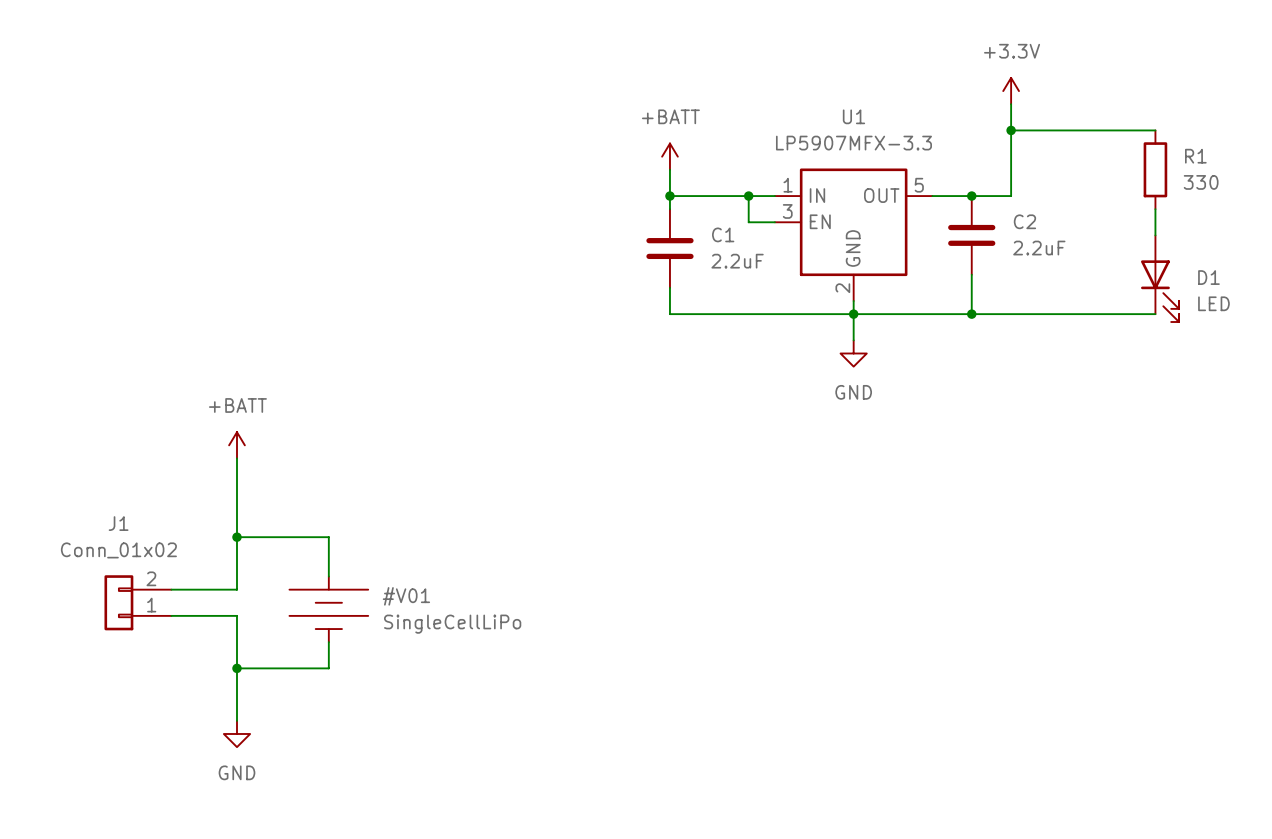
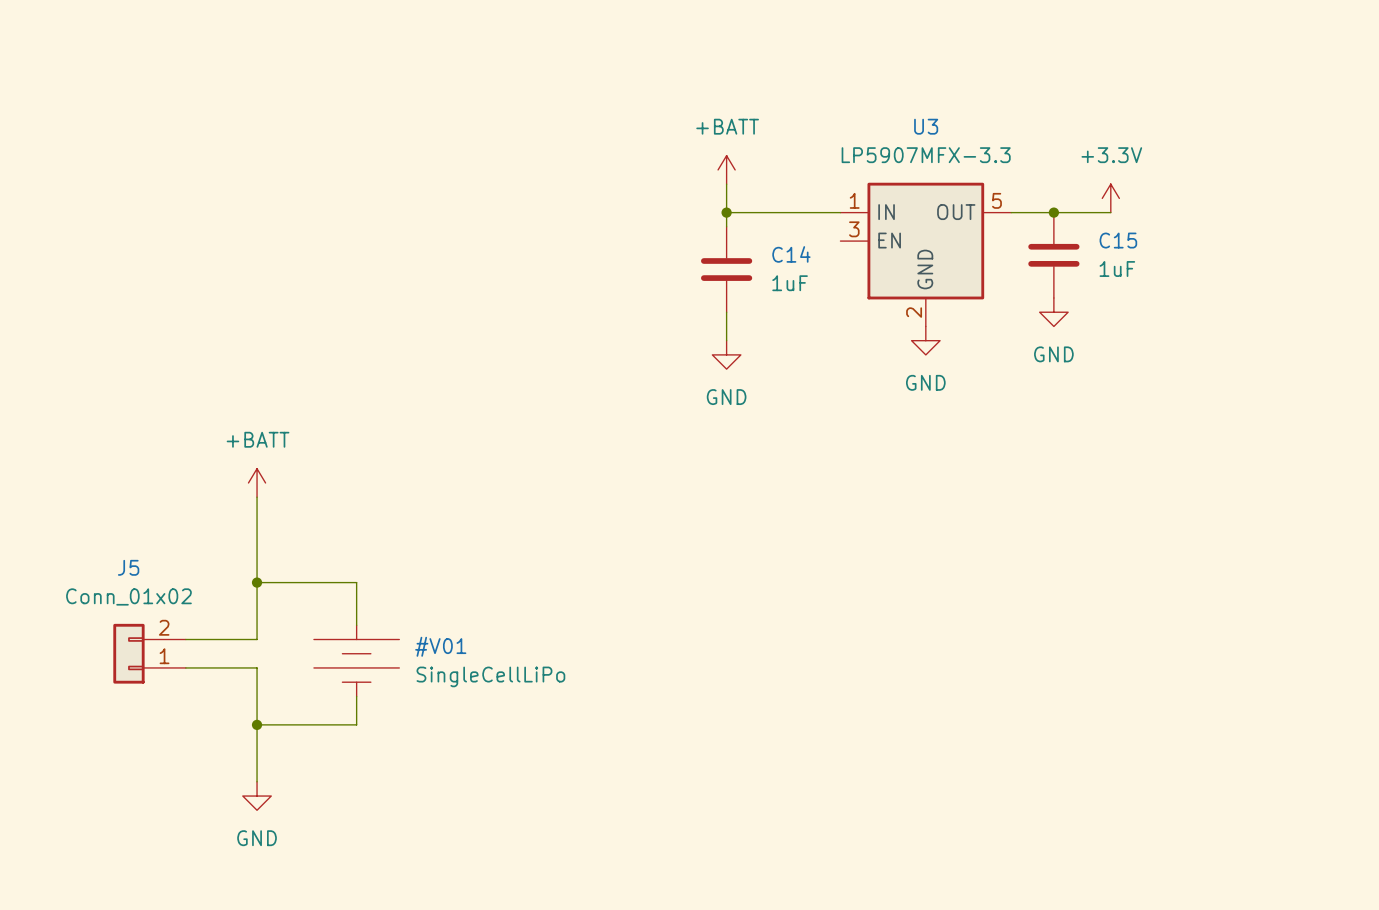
power symbol position: +3.3V (1011, 91) -> +3.3V (1110, 198)
wire: (1011, 104) (1011, 196) -> (1110, 212) (1096, 212)
U1 name: U1 (853, 116) -> U3 (926, 126)
wire: (1011, 130) (1155, 130) -> none
junction: (1011, 130) -> none
R1: 330 (1155, 169) -> none
wire: (748, 196) (748, 222) (774, 222) -> none
junction: (748, 196) -> none
wire: (1155, 209) (1155, 235) -> none
C2 name: C2 (1024, 221) -> C15 (1118, 240)
C1 name: C1 (723, 234) -> C14 (791, 254)
C2 value: 2.2uF (1039, 248) -> 1uF (1117, 269)
C1 value: 2.2uF (737, 261) -> 1uF (790, 283)
wire: (971, 274) (971, 314) -> none
D1: LED (1160, 278) -> none
power symbol: none -> GND (1053, 312)
wire: (853, 301) (853, 340) -> none
wire: (669, 314) (1155, 314) -> none
junction: (853, 314) -> none
junction: (971, 314) -> none
power symbol: none -> GND (726, 354)
power symbol position: GND (853, 353) -> GND (925, 340)
J1 name: J1 (118, 523) -> J5 (128, 567)

